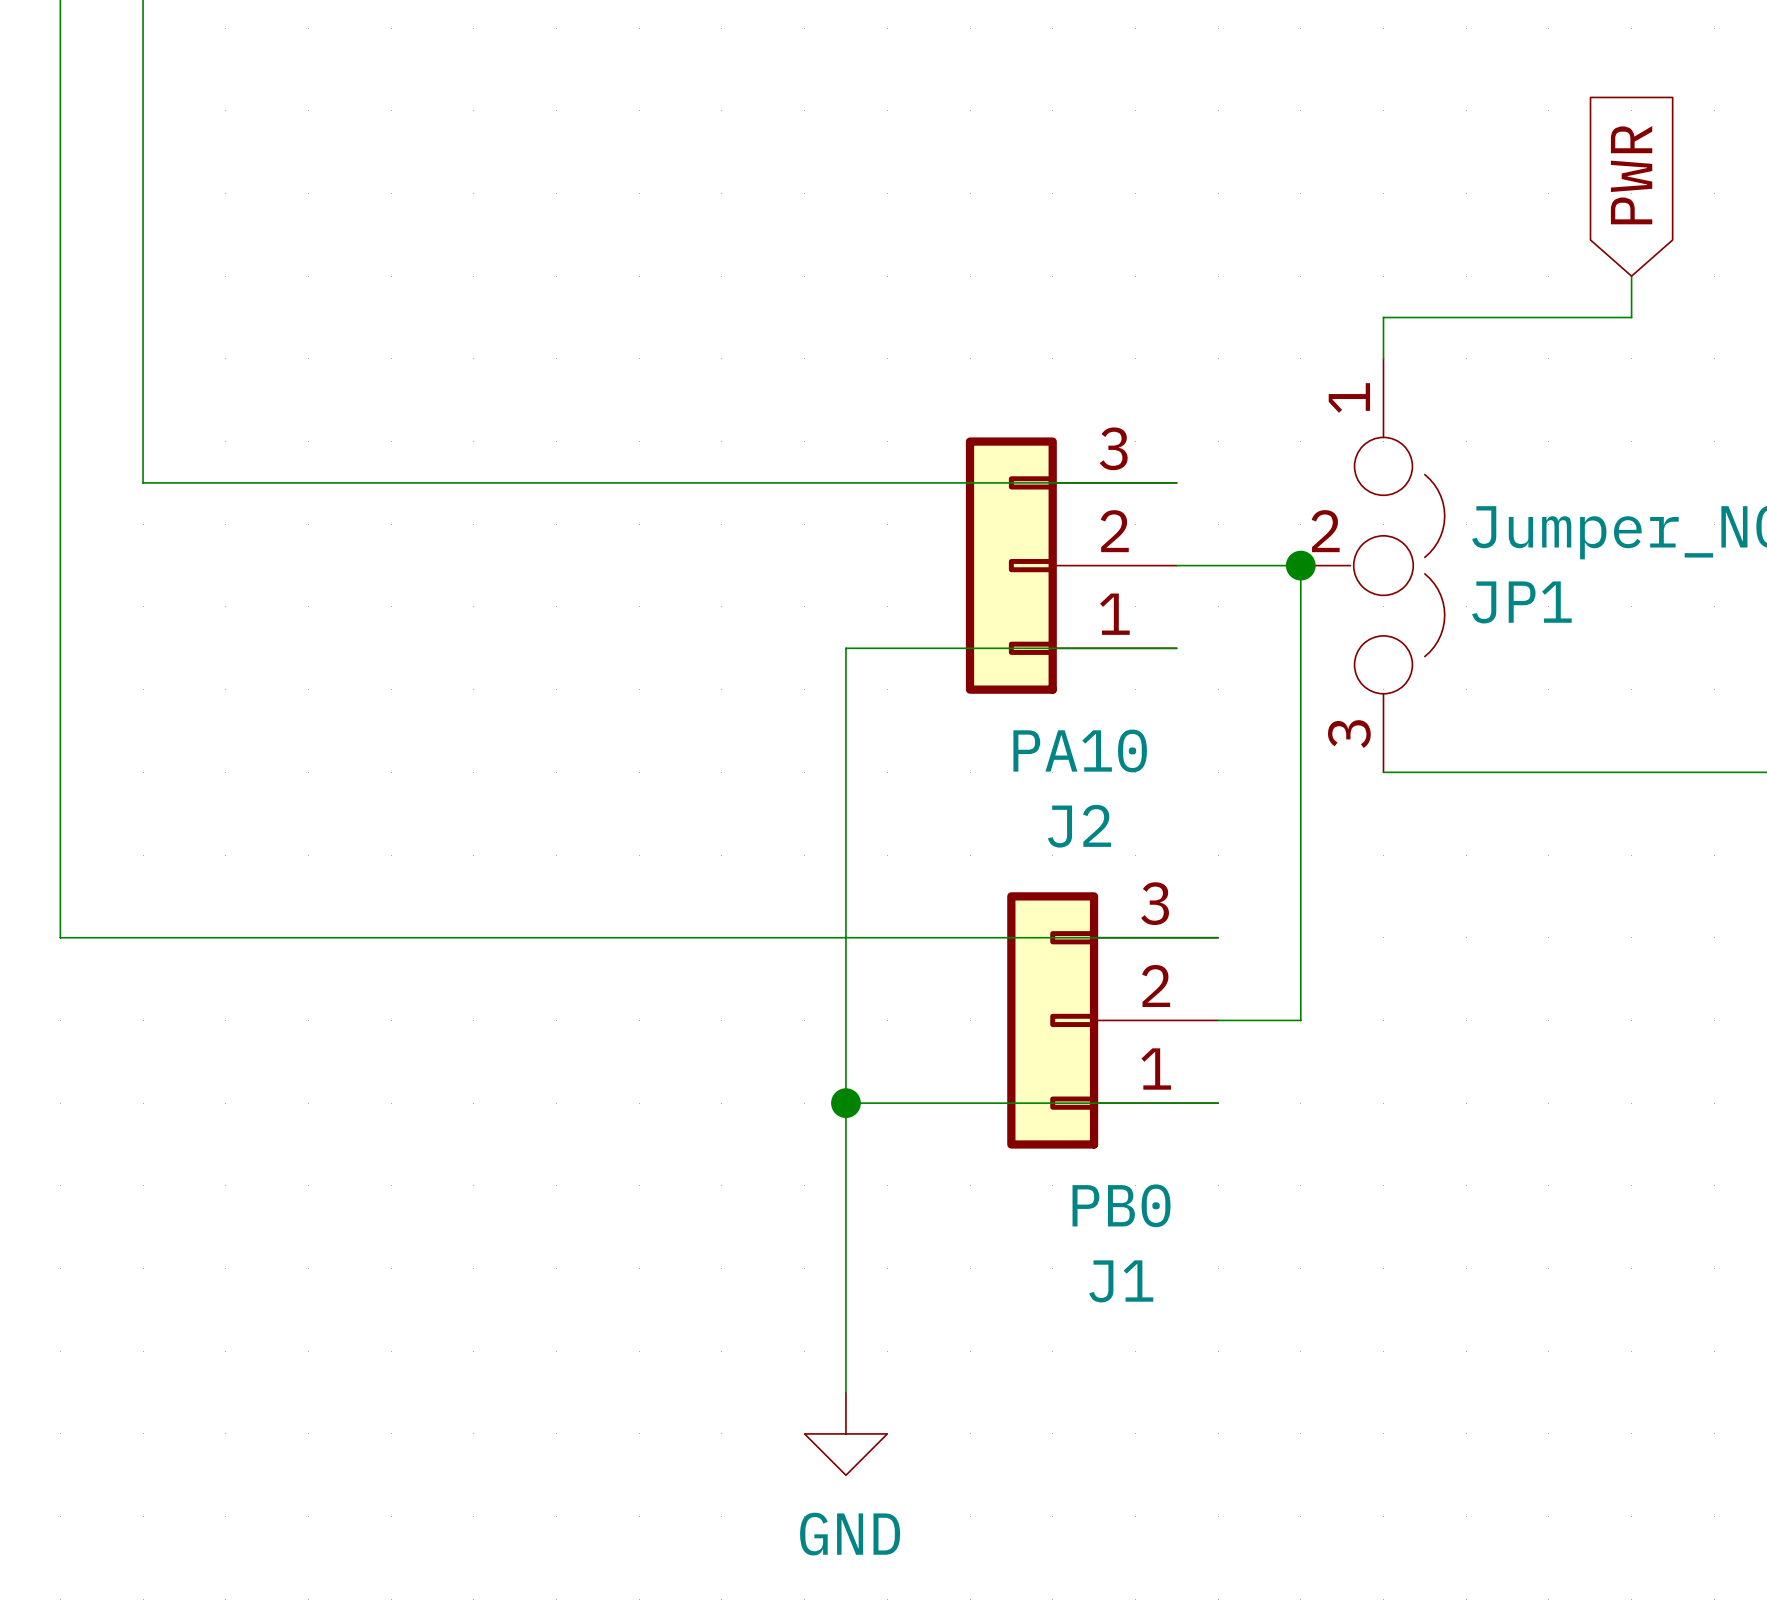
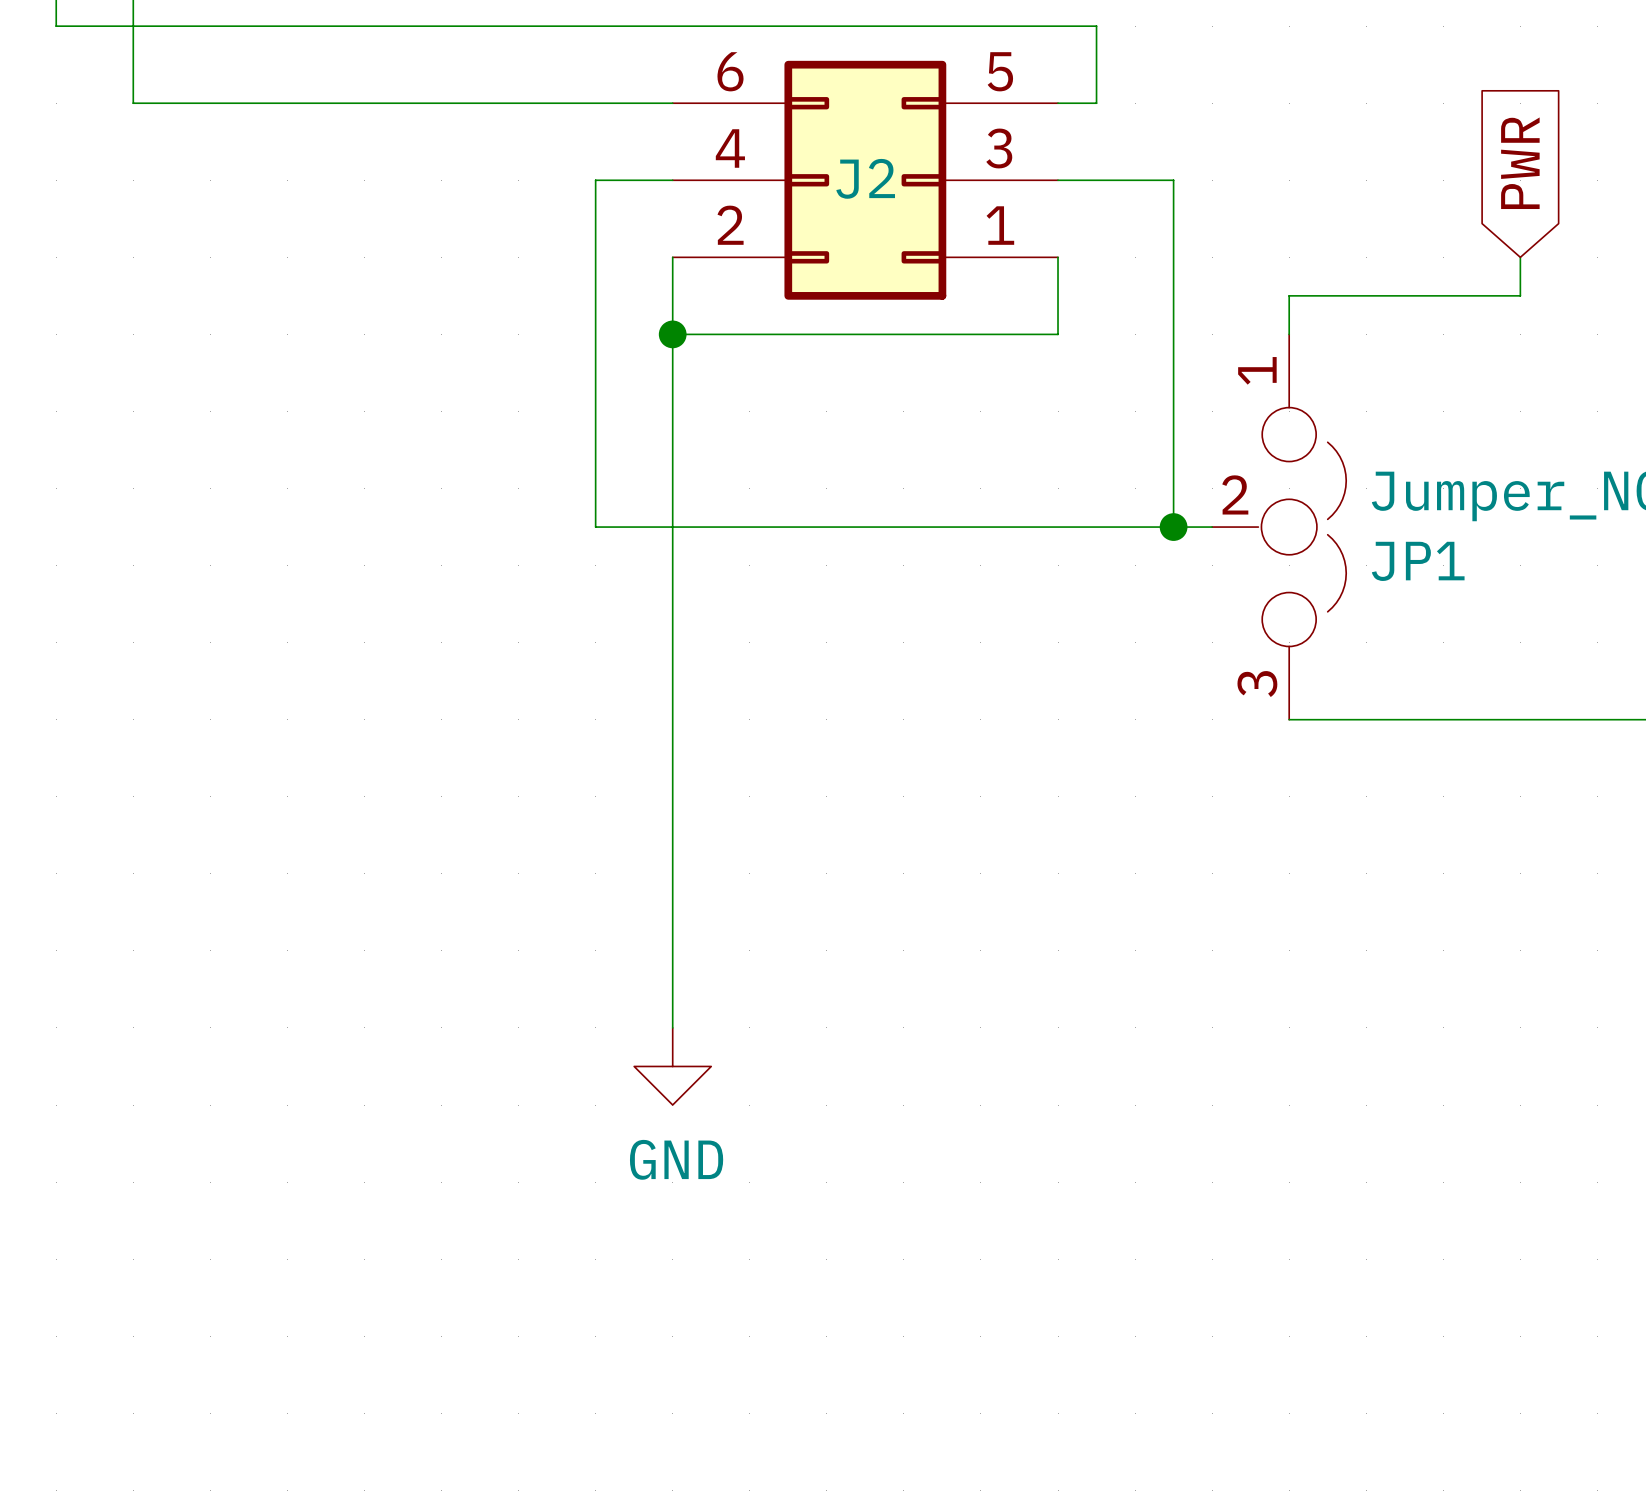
wire: (60, 28) (60, 937) (1218, 937) -> (56, 26) (1096, 26) (1096, 103) (1058, 103)
wire: (143, 110) (143, 482) (1176, 482) -> (133, 103) (672, 103)
wire: none -> (672, 180) (595, 180) (595, 527) (1096, 527)
wire: none -> (1058, 180) (1173, 180) (1173, 527)
wire: none -> (672, 257) (672, 1027)
wire: none -> (1058, 257) (1058, 334) (672, 334)
junction: none -> (672, 334)
J2 symbol: [965, 437, 1177, 694] -> [672, 60, 1059, 300]
wire: (1300, 565) (1300, 1020) (1218, 1020) -> none
junction position: (1300, 565) -> (1173, 527)
wire: (1176, 648) (845, 648) (845, 1392) -> none
J2 value: PA10 (1080, 750) -> none
J2 name position: J2 (1079, 826) -> J2 (865, 178)
J1: PB0 (1112, 1020) -> none
wire: (845, 1103) (1218, 1103) -> none
junction: (845, 1103) -> none
power symbol position: GND (845, 1433) -> GND (672, 1066)

